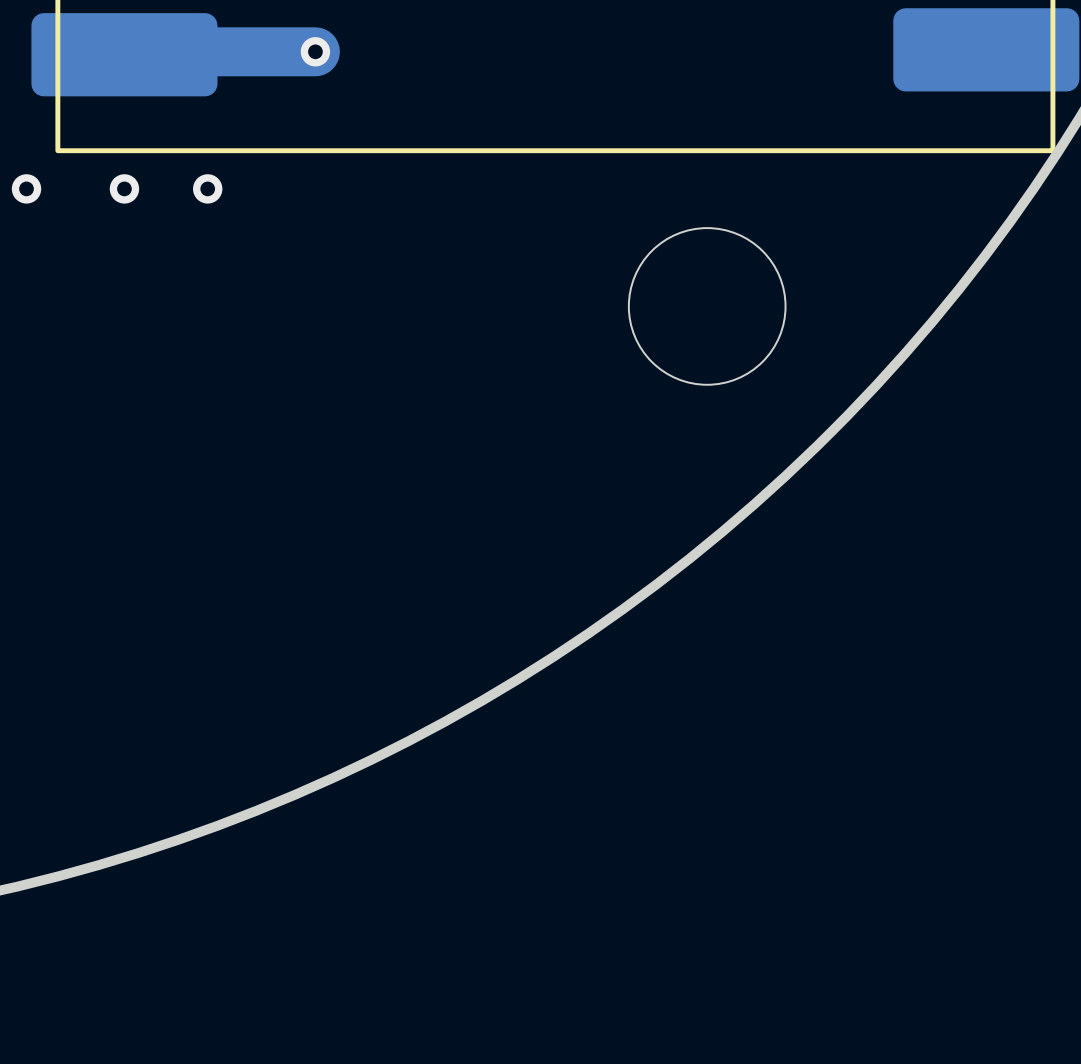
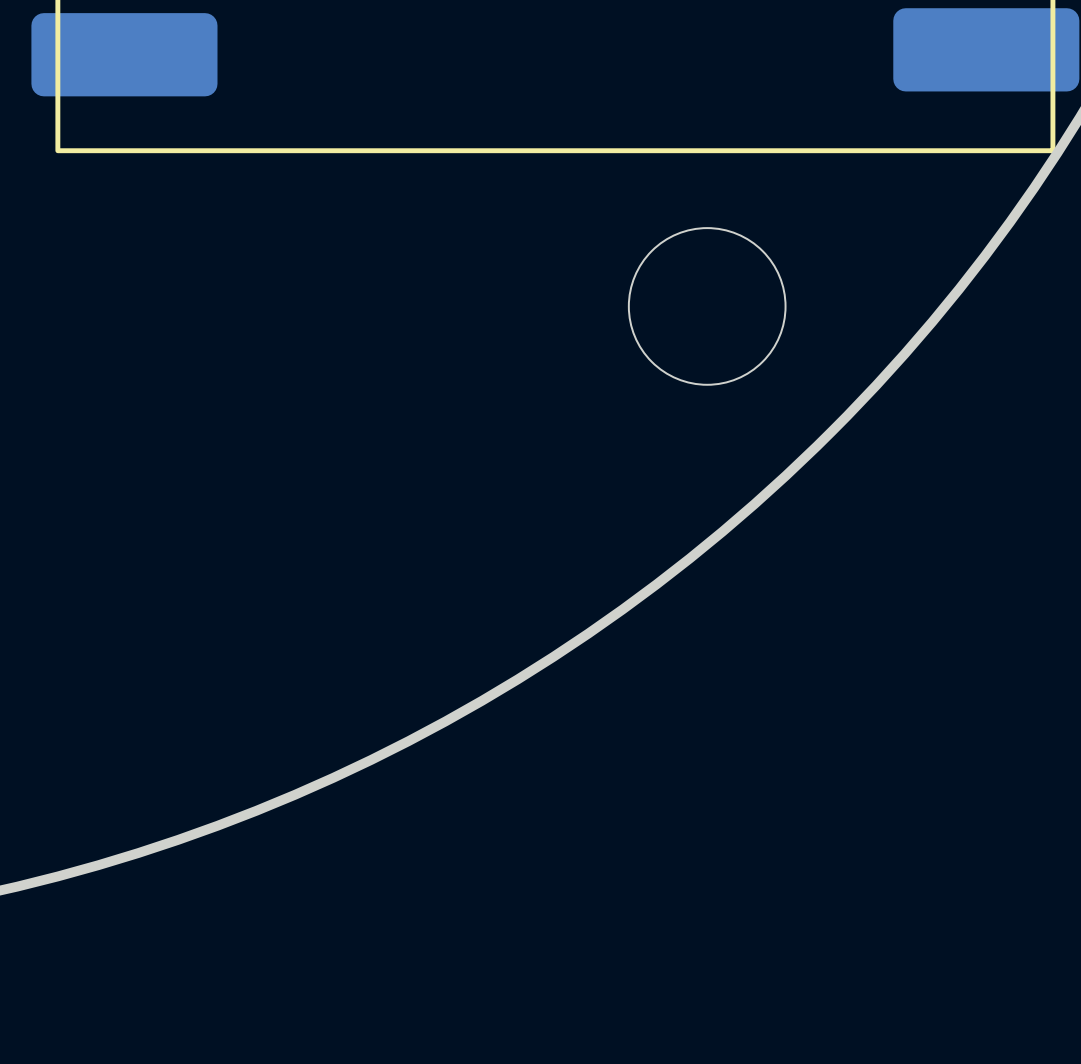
track: (315, 51) (171, 51) -> none
via: (315, 51) -> none
via: (26, 188) -> none
via: (124, 188) -> none
via: (207, 188) -> none

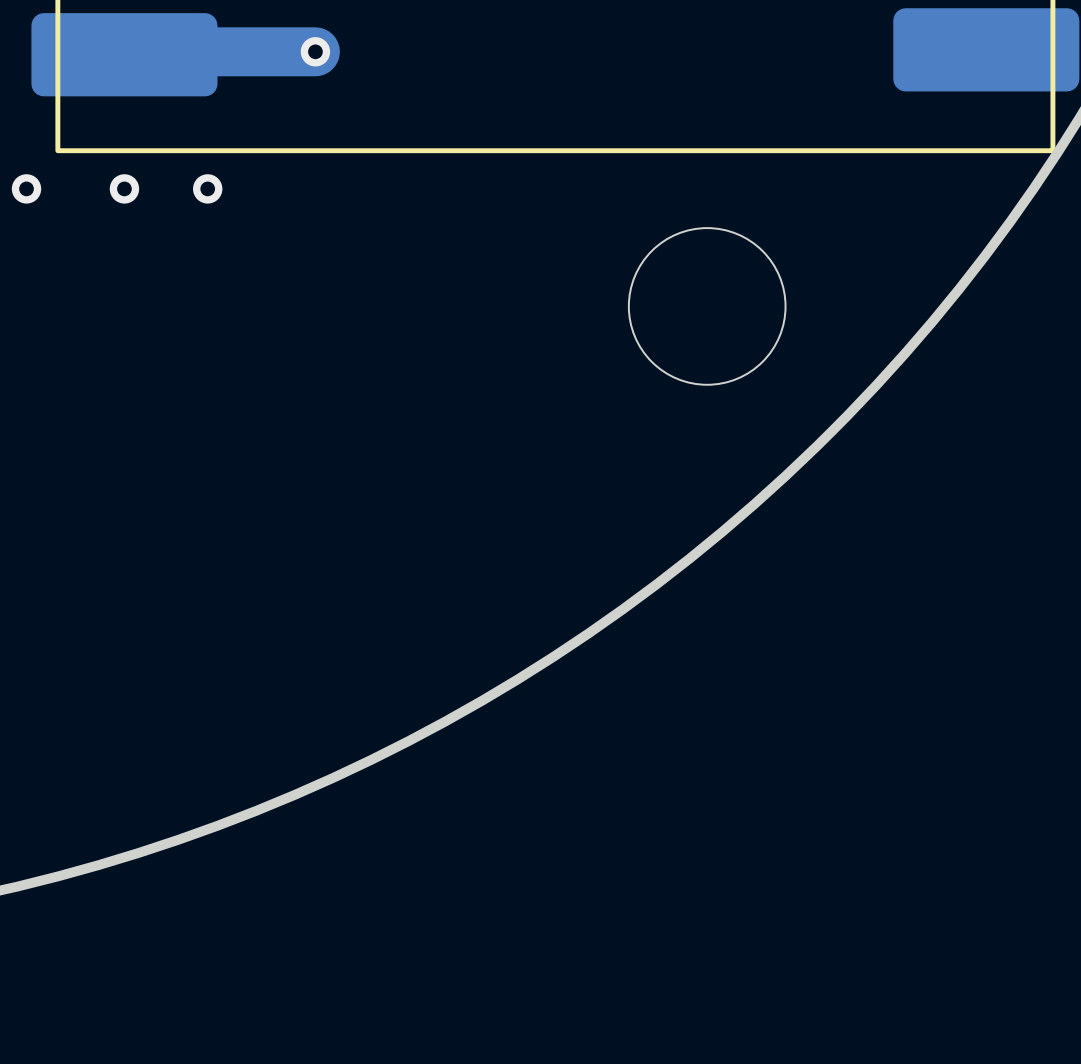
track: none -> (315, 51) (171, 51)
via: none -> (315, 51)
via: none -> (26, 188)
via: none -> (124, 188)
via: none -> (207, 188)

